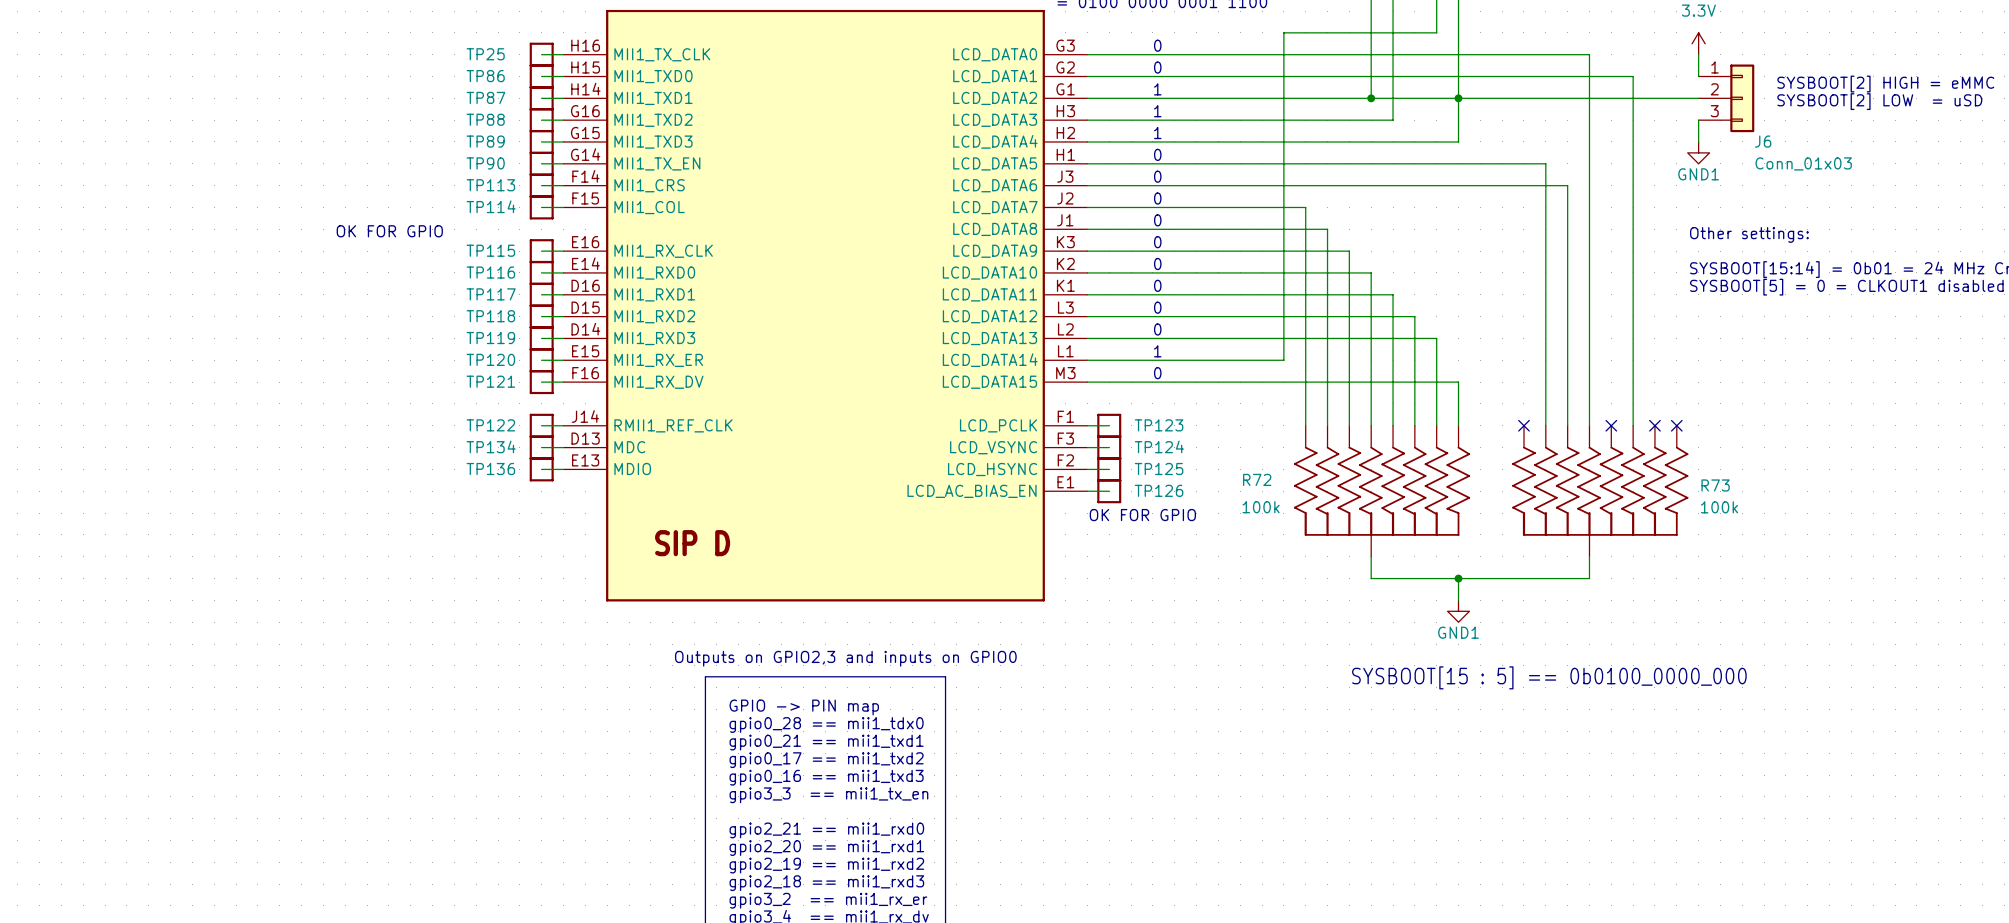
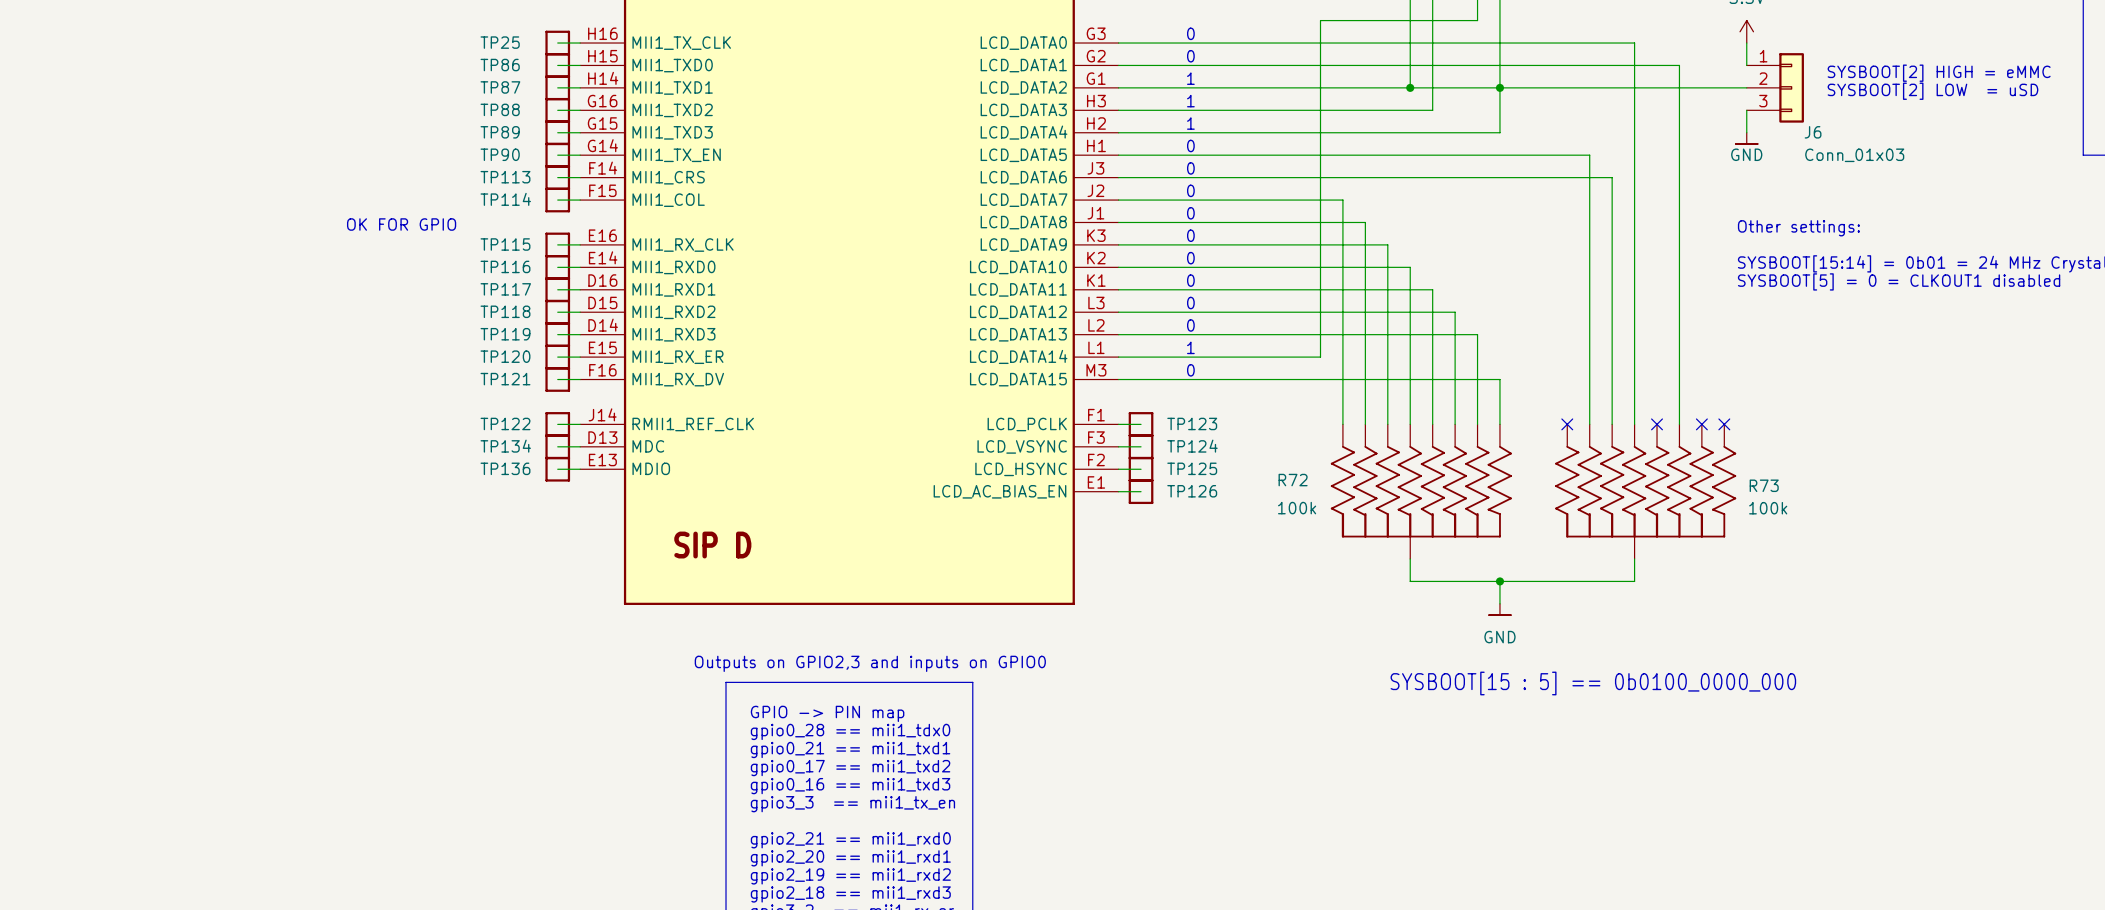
power symbol: GND1 (1698, 152) -> GND (1746, 138)
text: OK FOR GPIO (1142, 515) -> none
power symbol: GND1 (1458, 611) -> GND (1499, 609)

